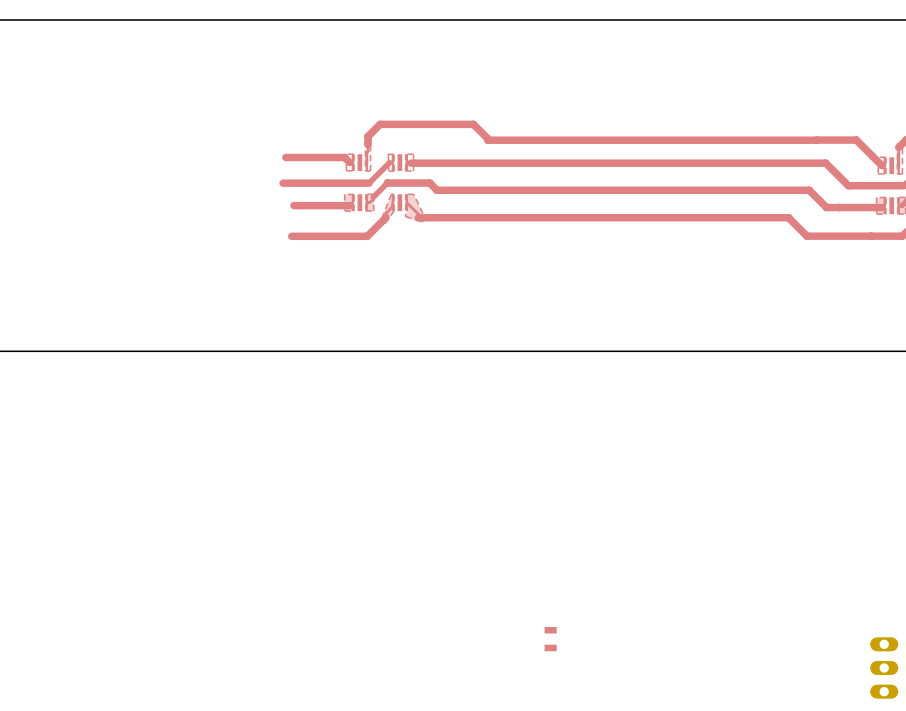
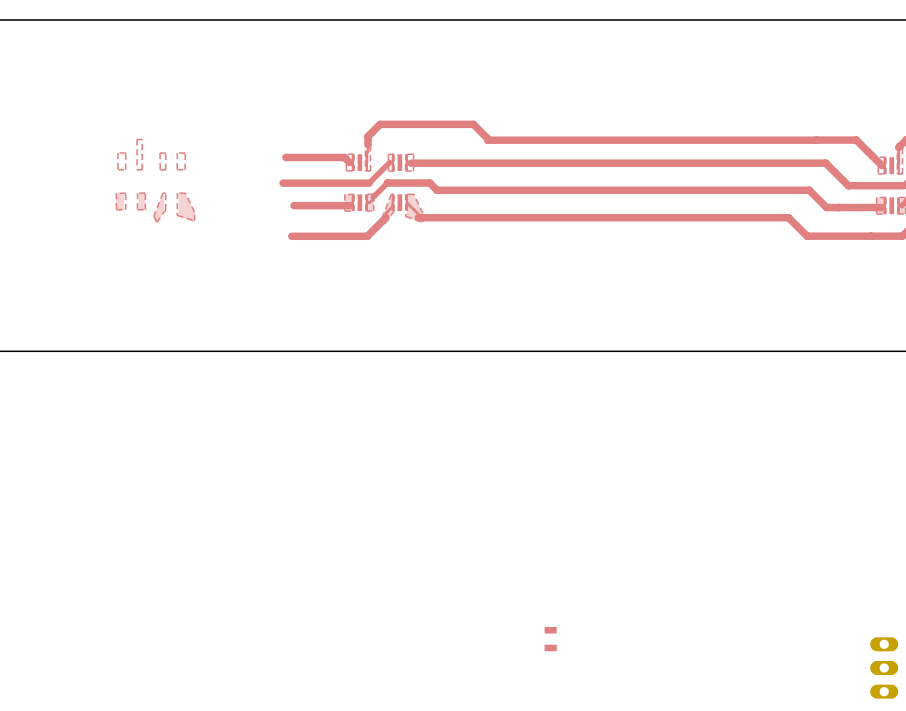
top zone outline: none -> (137, 139) (142, 139) (142, 169) (137, 169) (137, 139)
top zone outline: none -> (125, 152) (125, 169) (118, 169) (117, 152) (125, 152)
top zone outline: none -> (165, 153) (165, 169) (160, 169) (160, 153) (165, 153)
top zone outline: none -> (185, 153) (185, 169) (177, 169) (177, 153) (185, 153)
top zone outline: none -> (125, 193) (116, 193) (116, 209) (125, 209) (125, 193)
top zone outline: none -> (145, 193) (137, 193) (137, 209) (145, 209) (145, 193)
top zone outline: none -> (165, 193) (165, 209) (156, 222) (153, 216) (162, 193) (165, 193)
top zone outline: none -> (177, 193) (177, 215) (194, 220) (194, 212) (185, 193) (177, 193)

